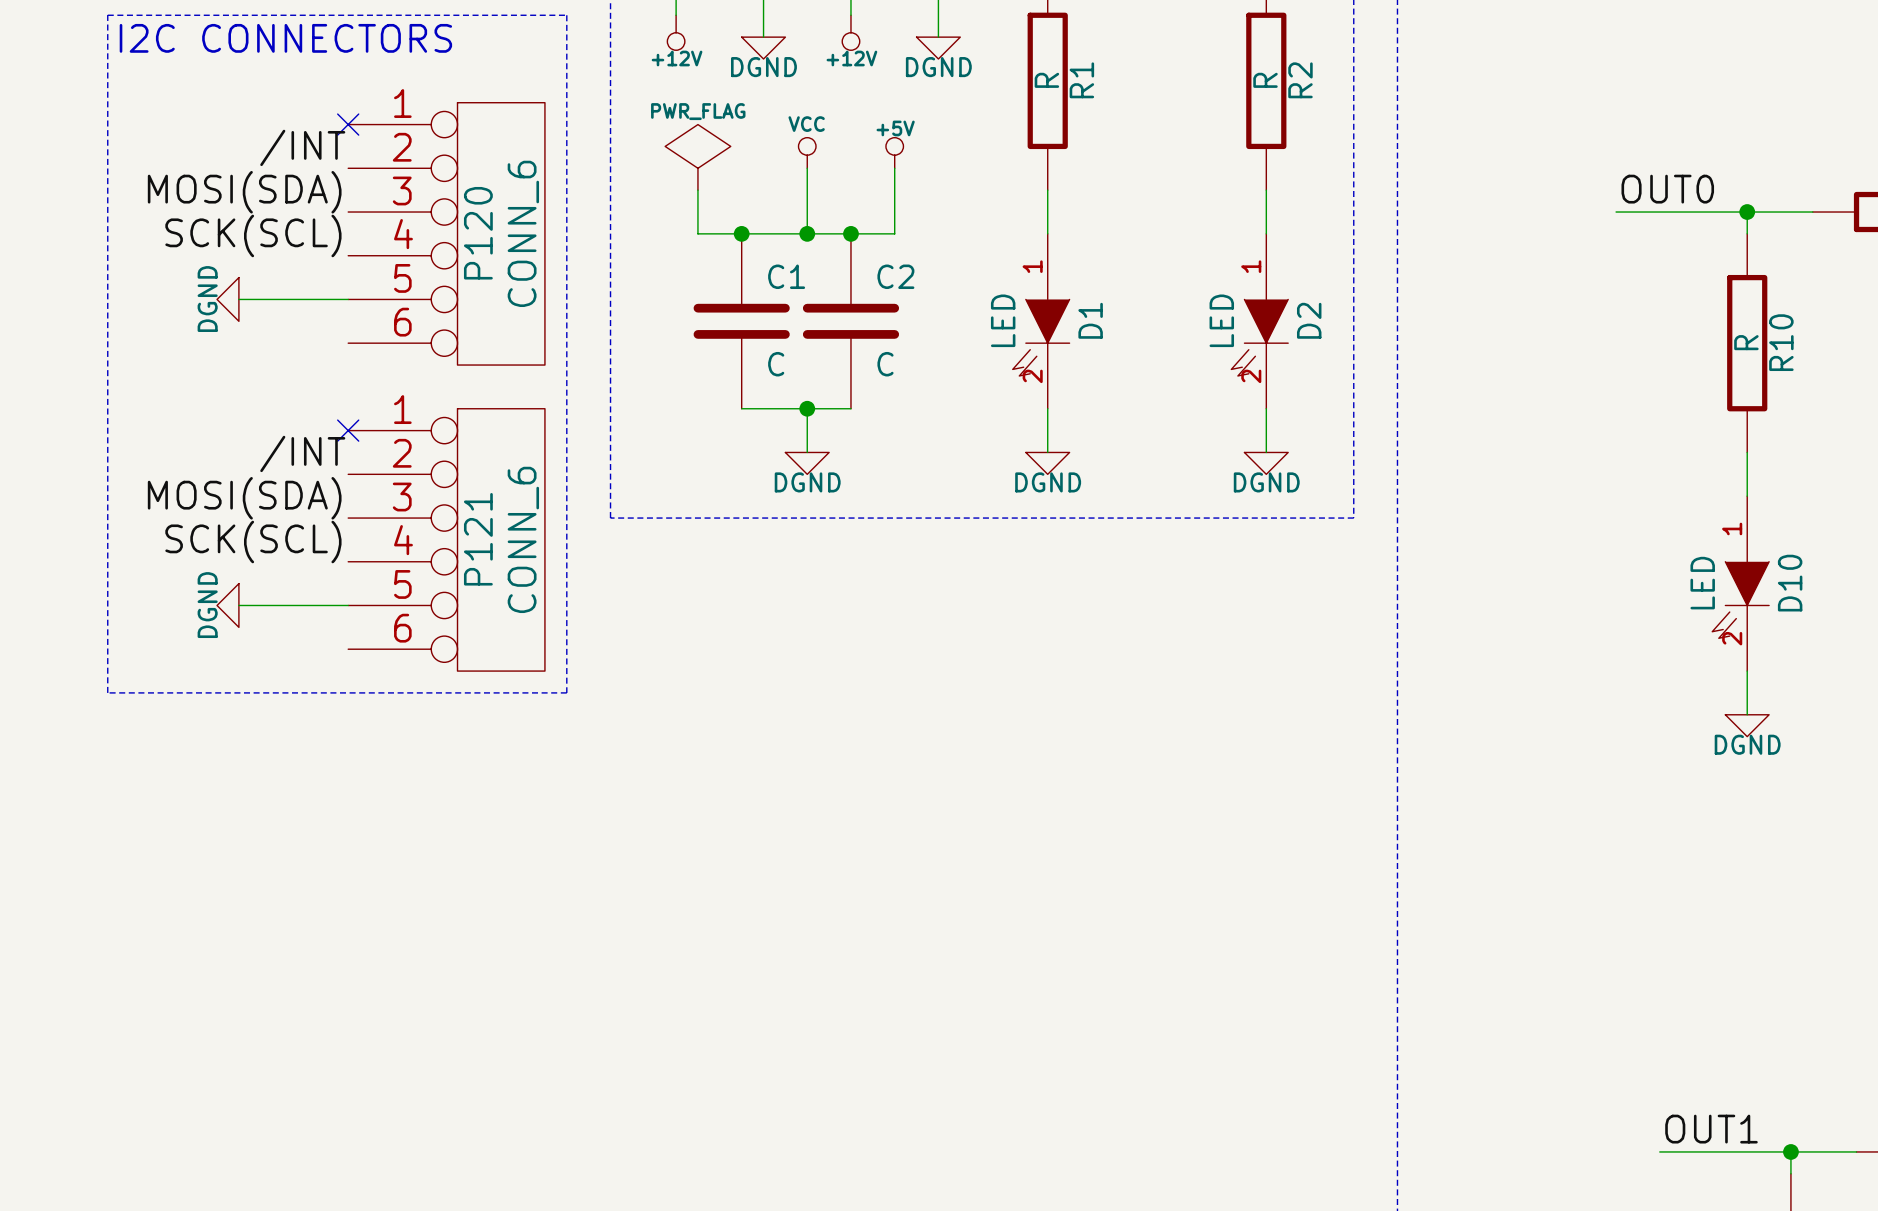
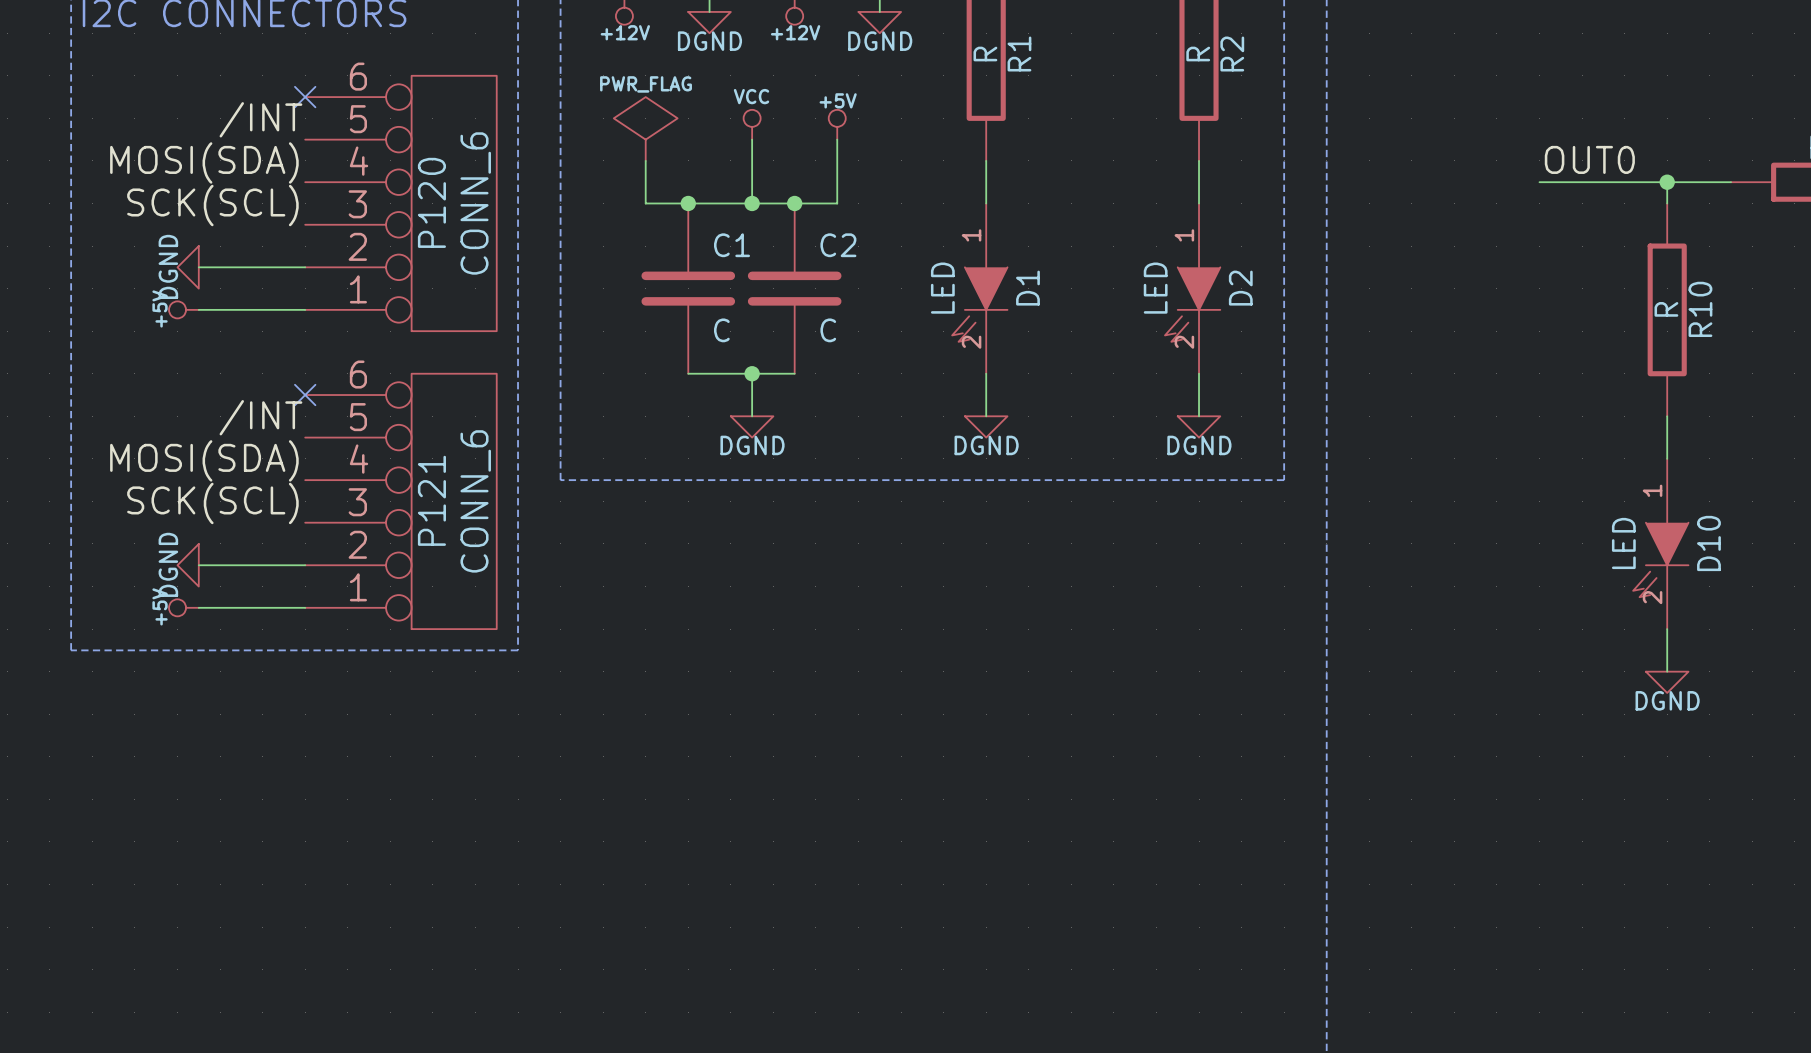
P120 flip: as is (501, 233) -> up-down (454, 203)
power symbol: none -> +5V (183, 309)
wire: none -> (198, 309) (305, 309)
P121 flip: as is (501, 539) -> up-down (454, 501)
power symbol: none -> +5V (183, 607)
wire: none -> (198, 607) (305, 607)

